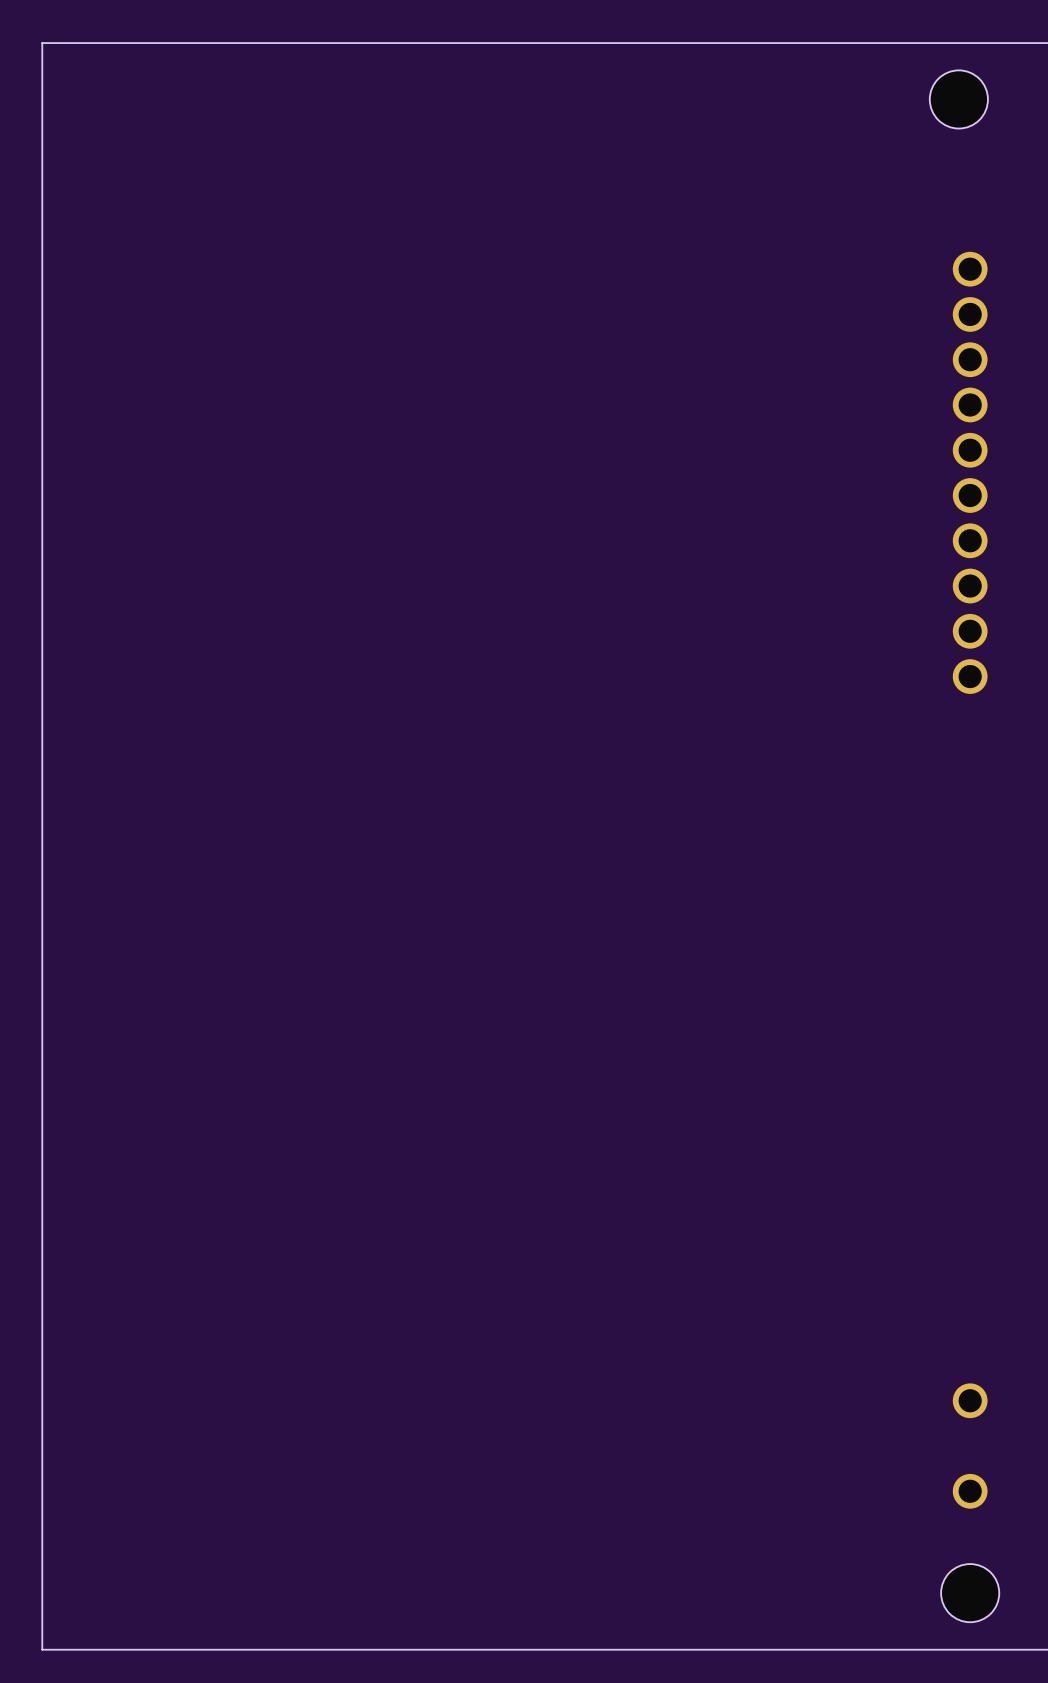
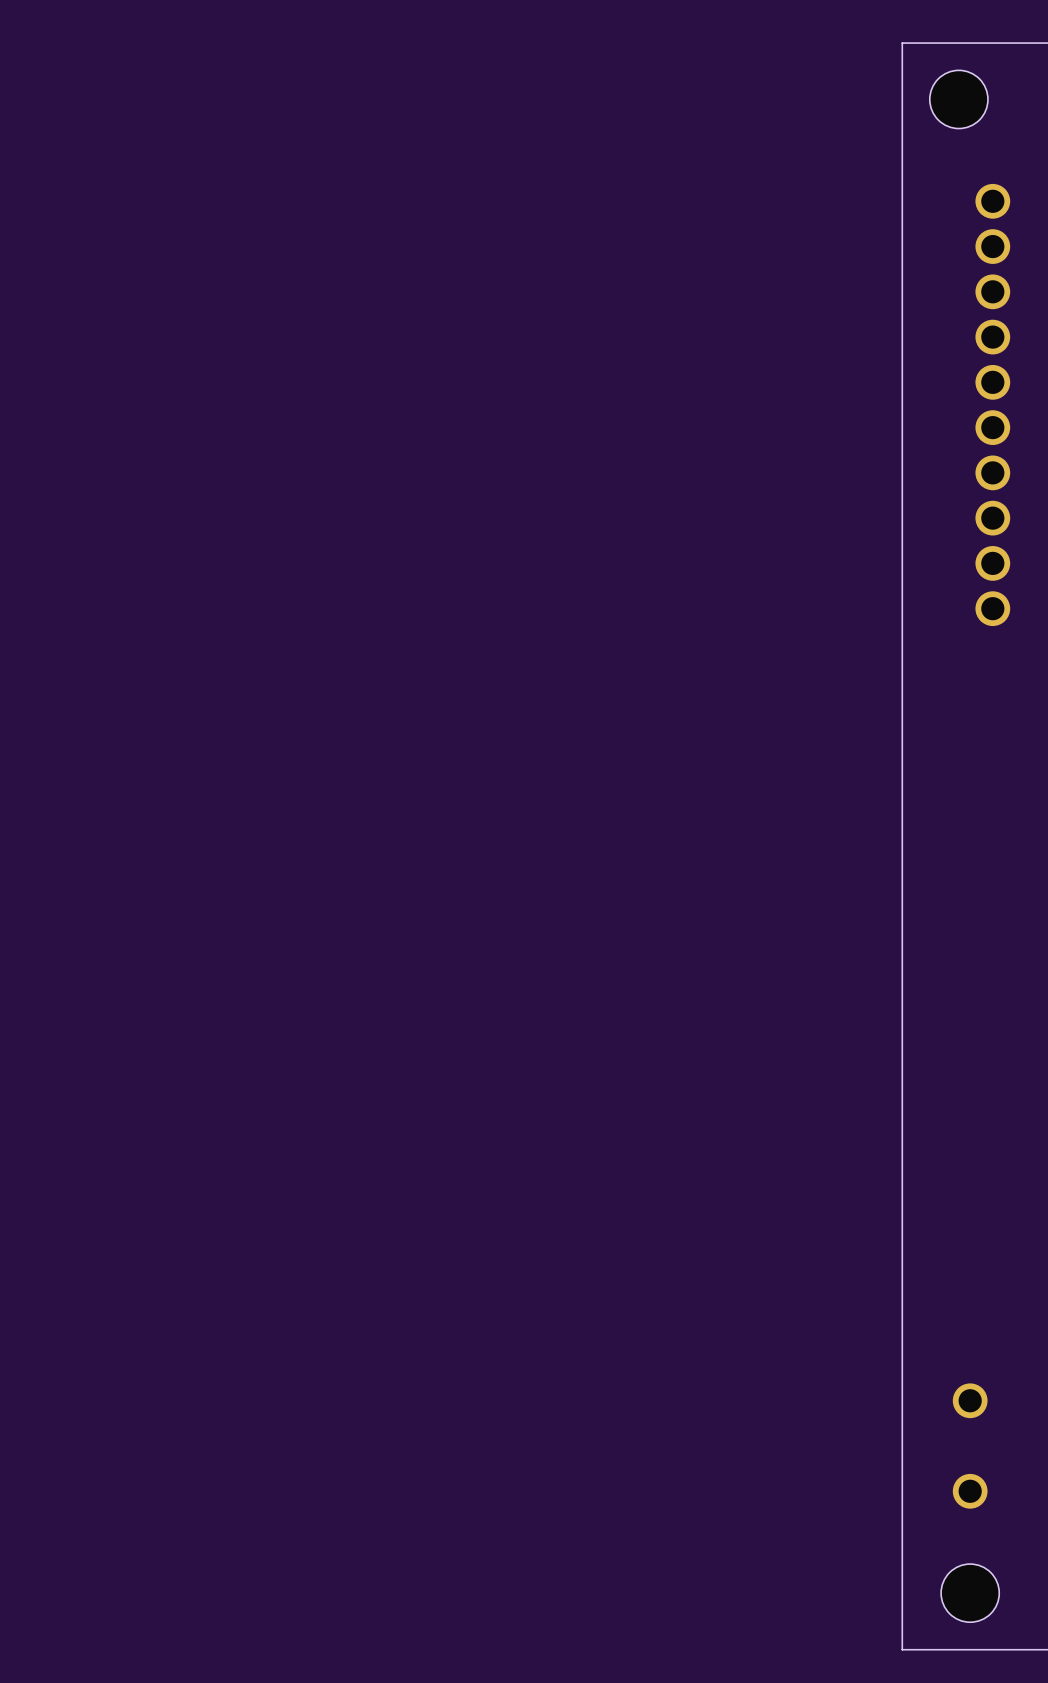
board edge: (902, 43) (42, 43) (42, 1649) (902, 1649) -> (902, 43) (902, 1649)
part position: (970, 472) -> (992, 404)

